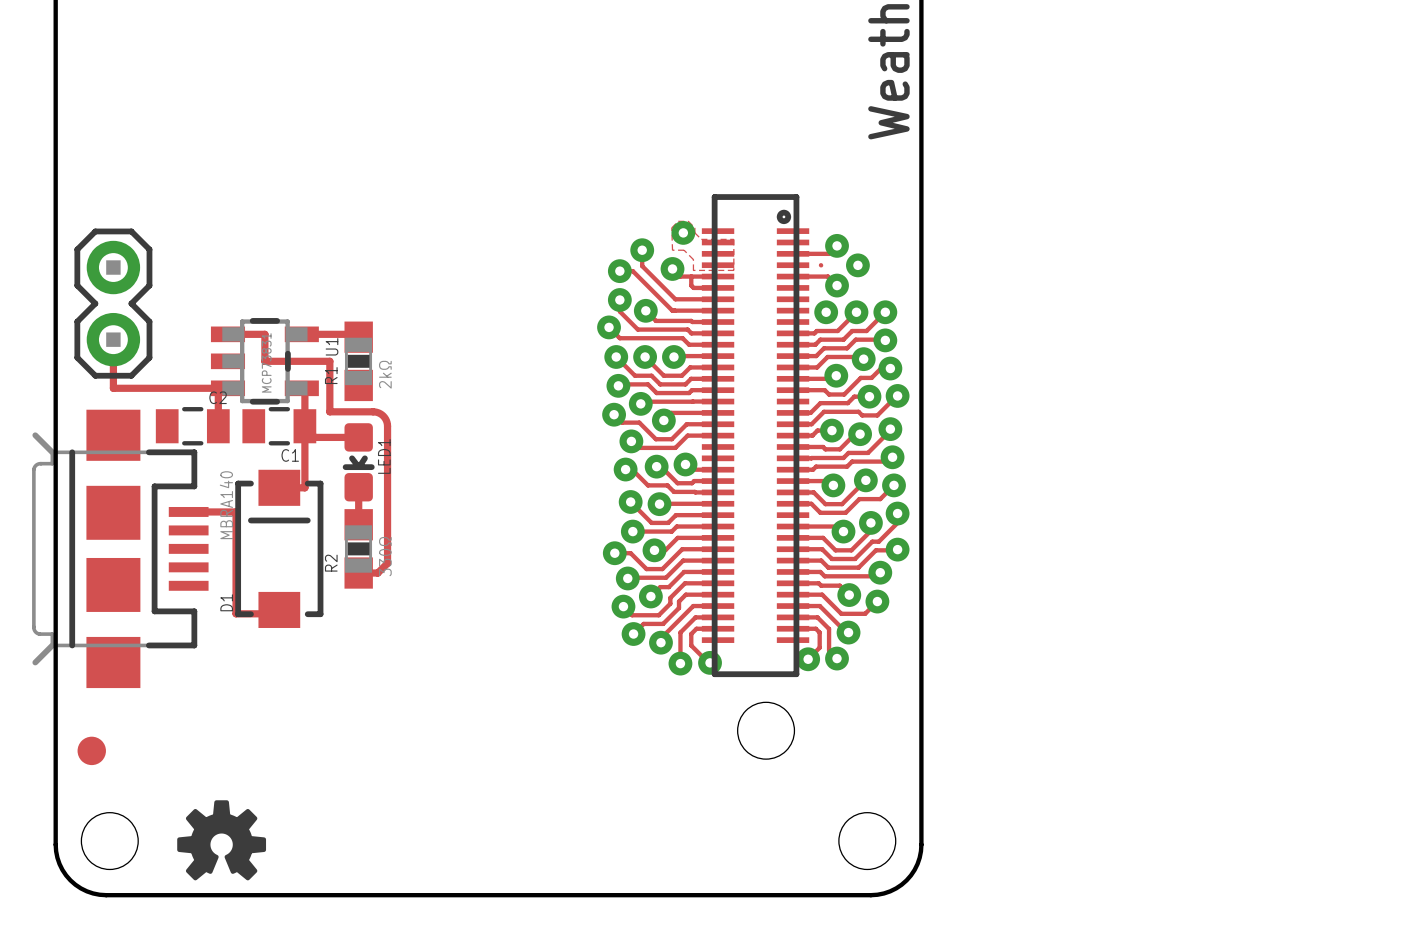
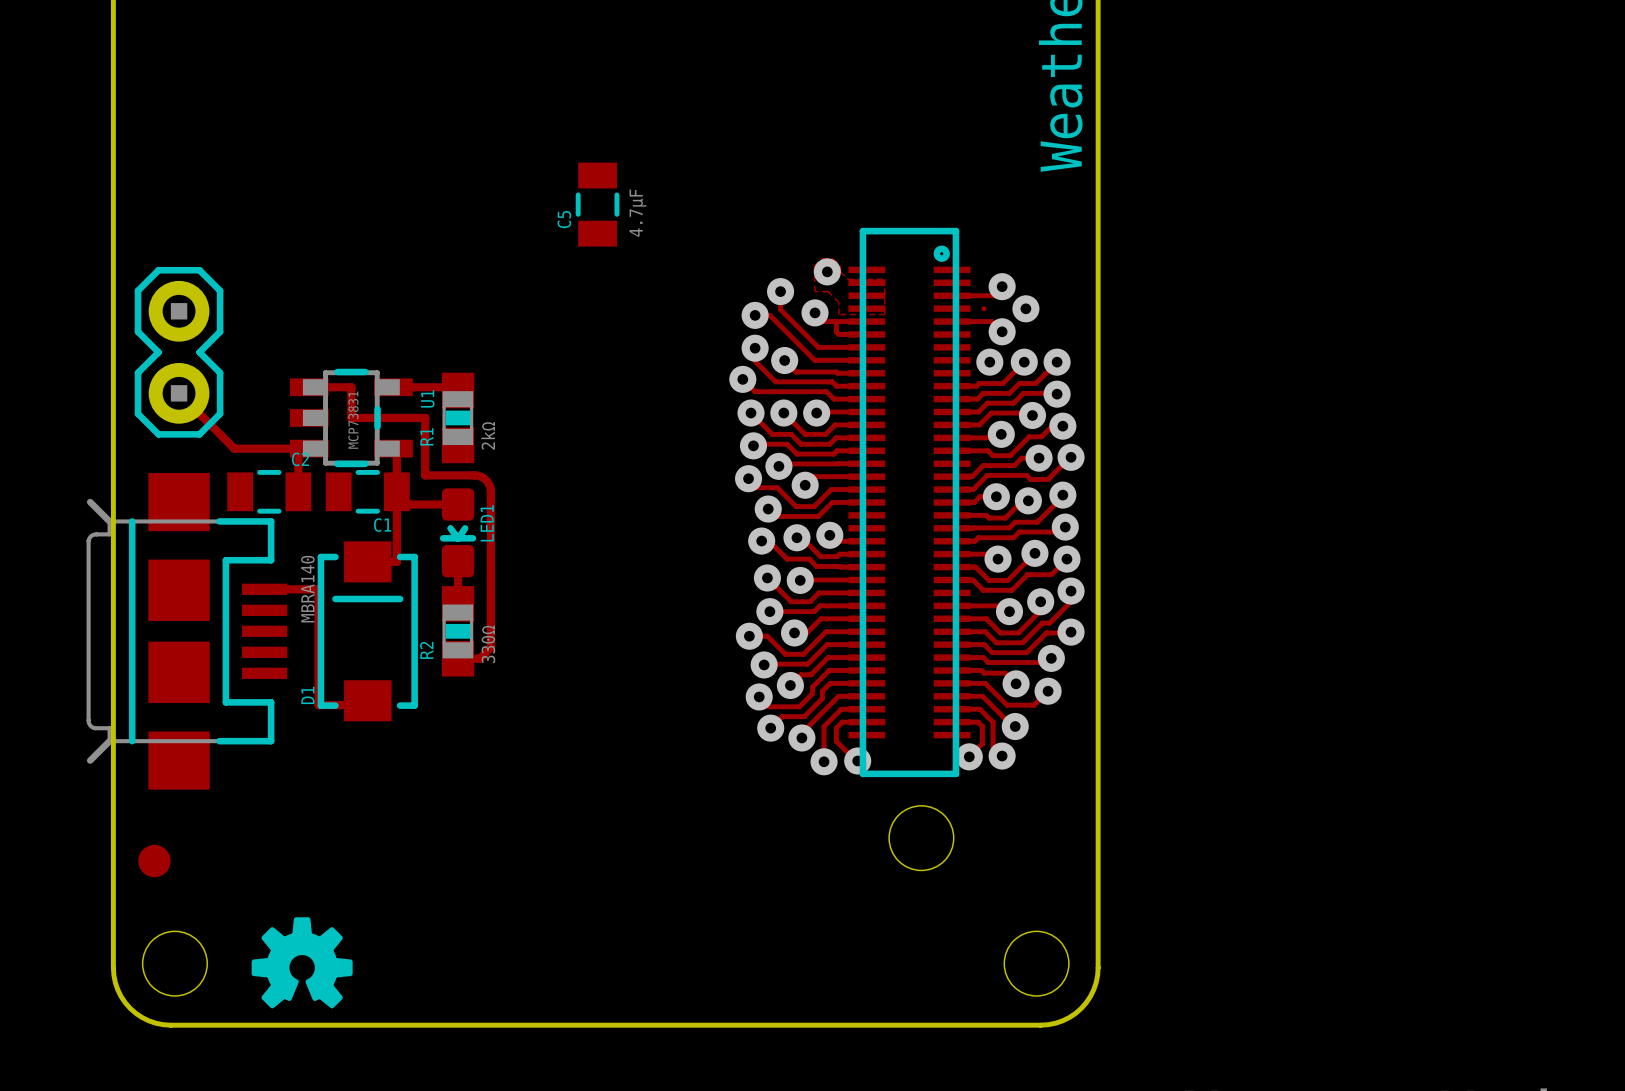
C5: none -> 4.7µF (597, 204)
track: (113, 339) (113, 388) (162, 388) -> (179, 393) (234, 448)

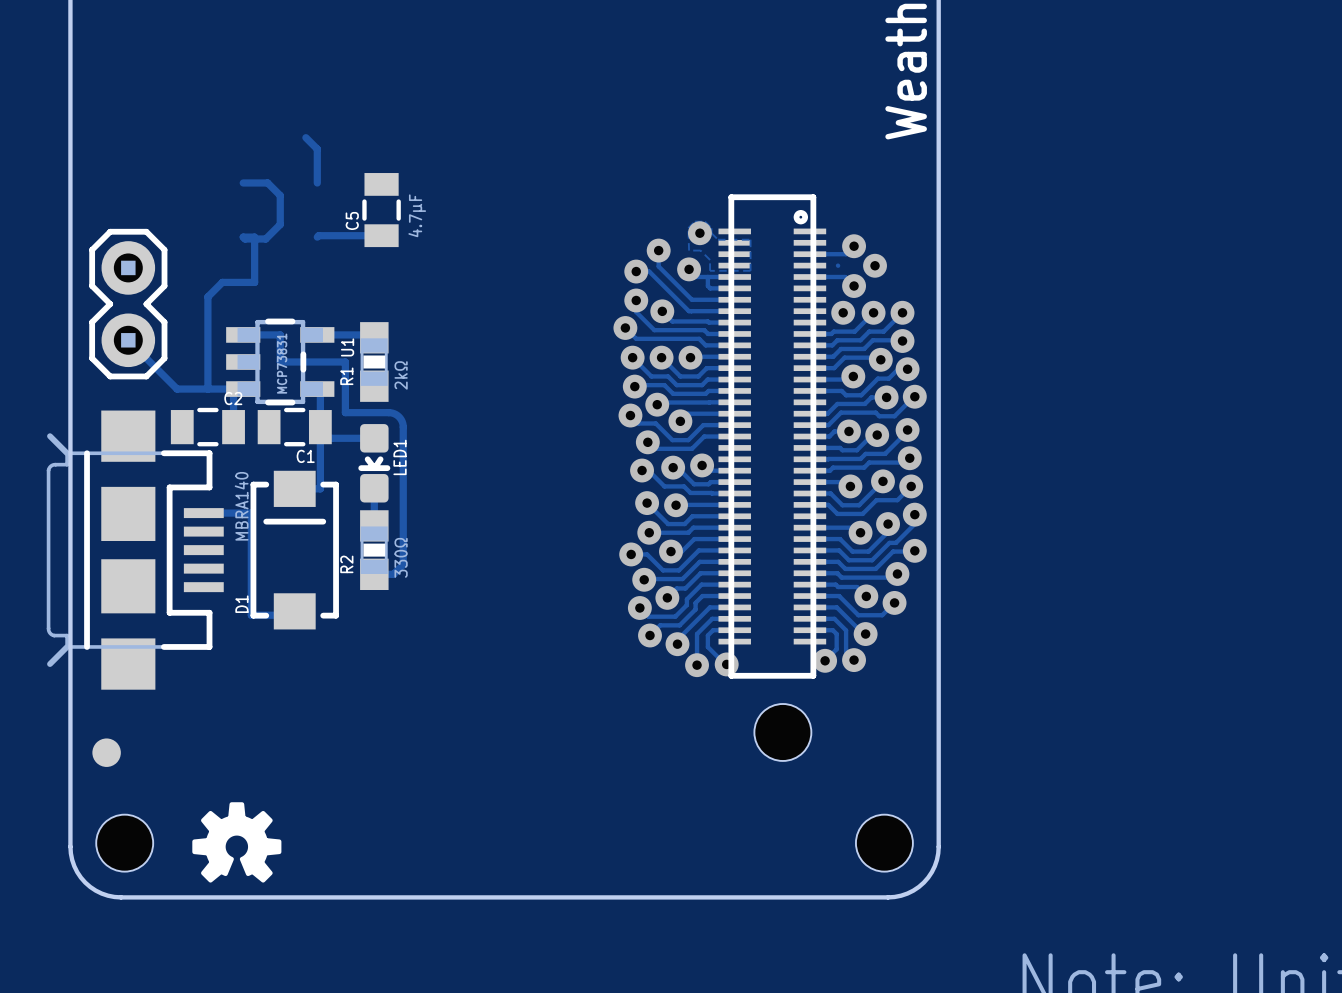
track: none -> (305, 137) (317, 149) (317, 182)
C5 position: (597, 204) -> (381, 210)
track: none -> (243, 182) (267, 182) (280, 195) (280, 224) (265, 238) (245, 238) (243, 237) (254, 237) (254, 282) (222, 282) (207, 296) (207, 389)
track: none -> (381, 235) (317, 237)

